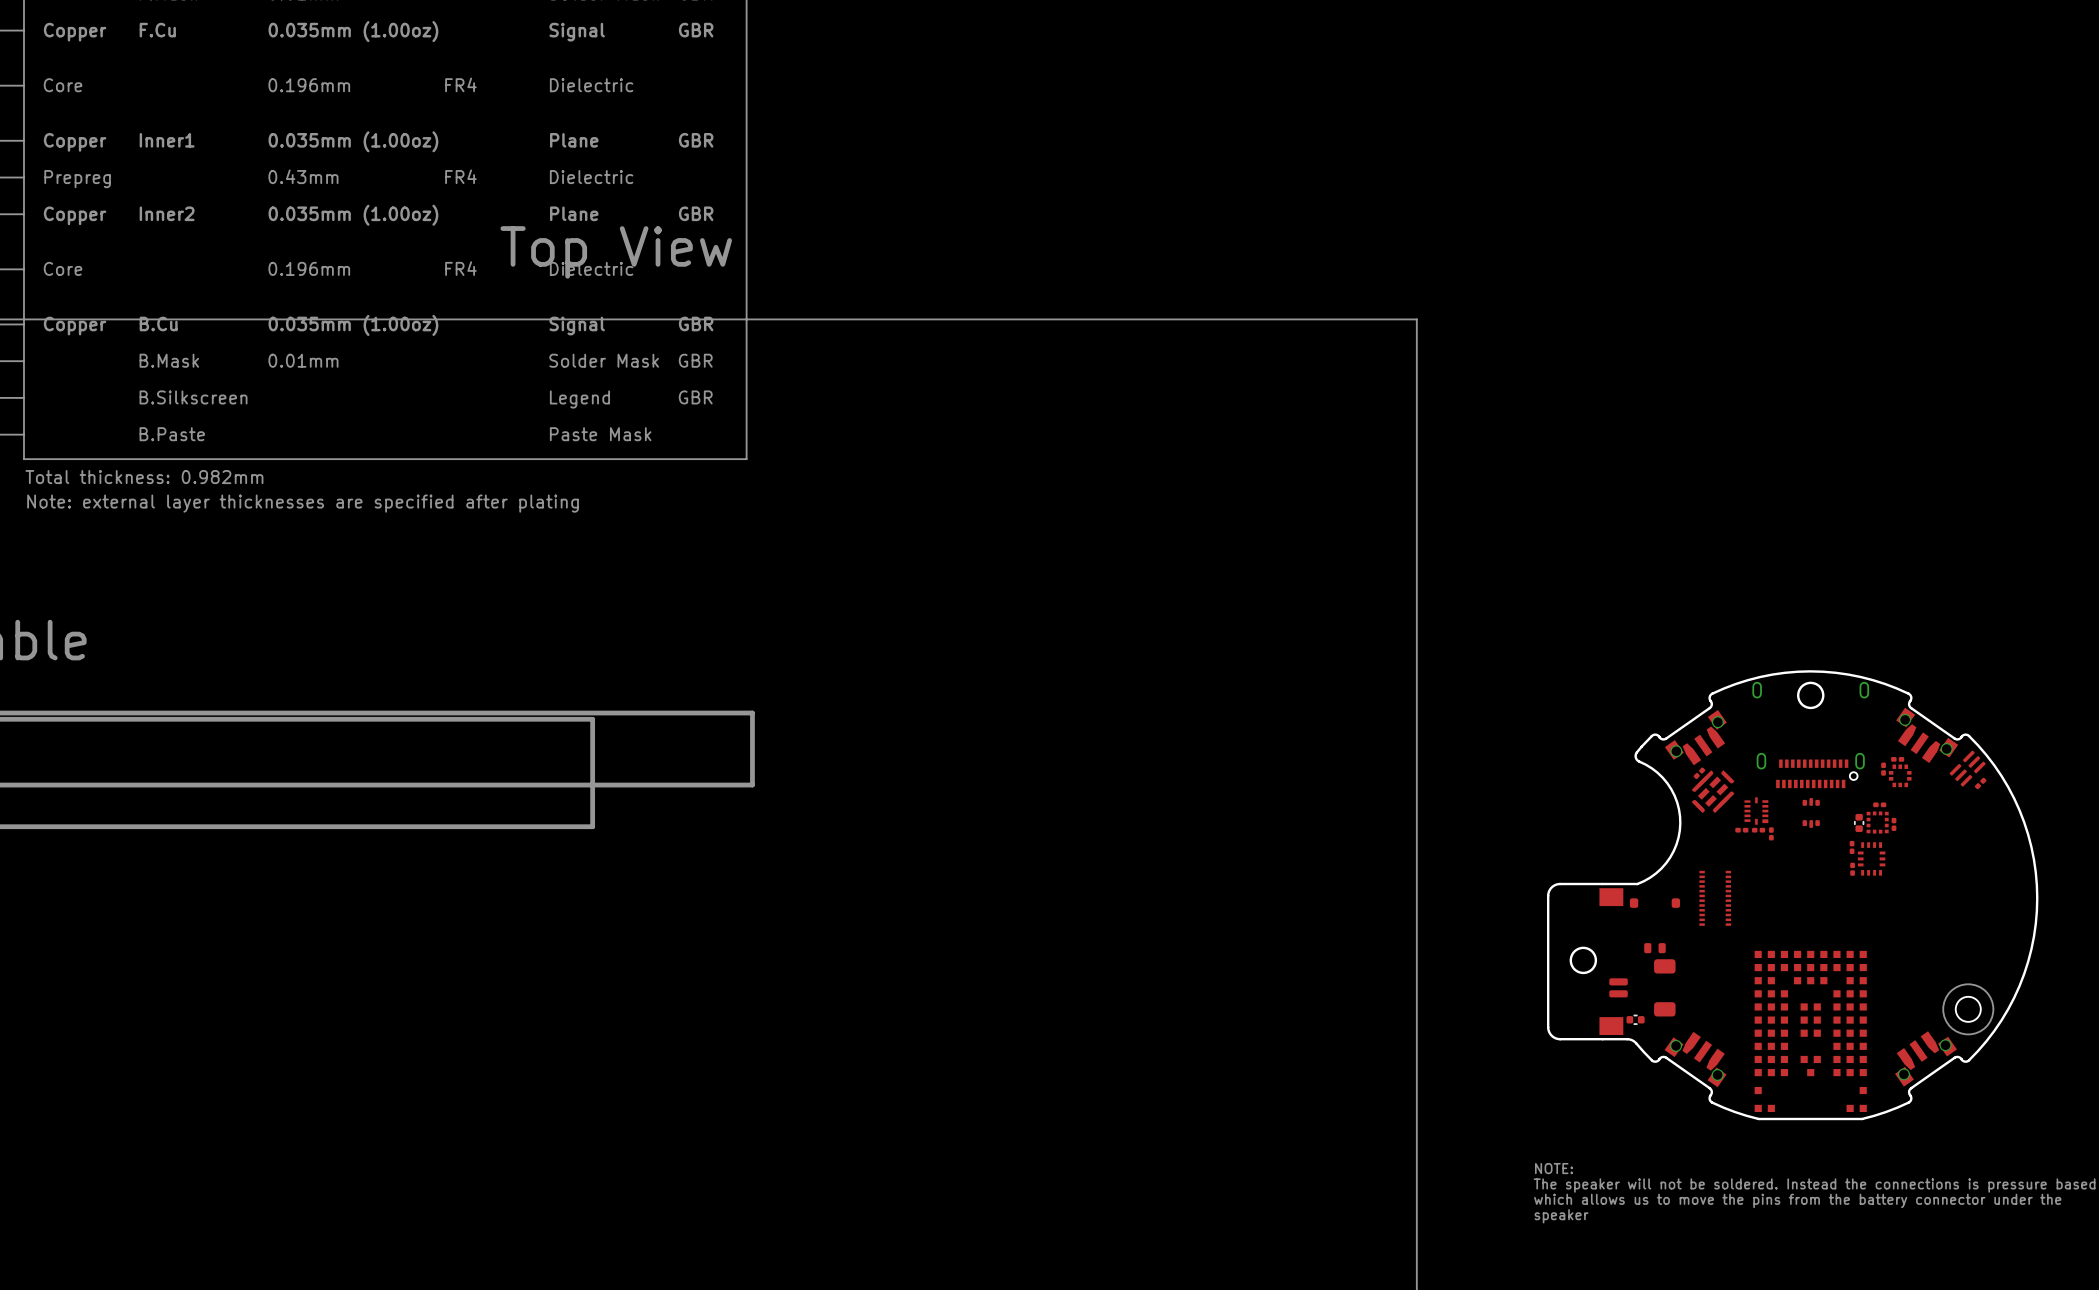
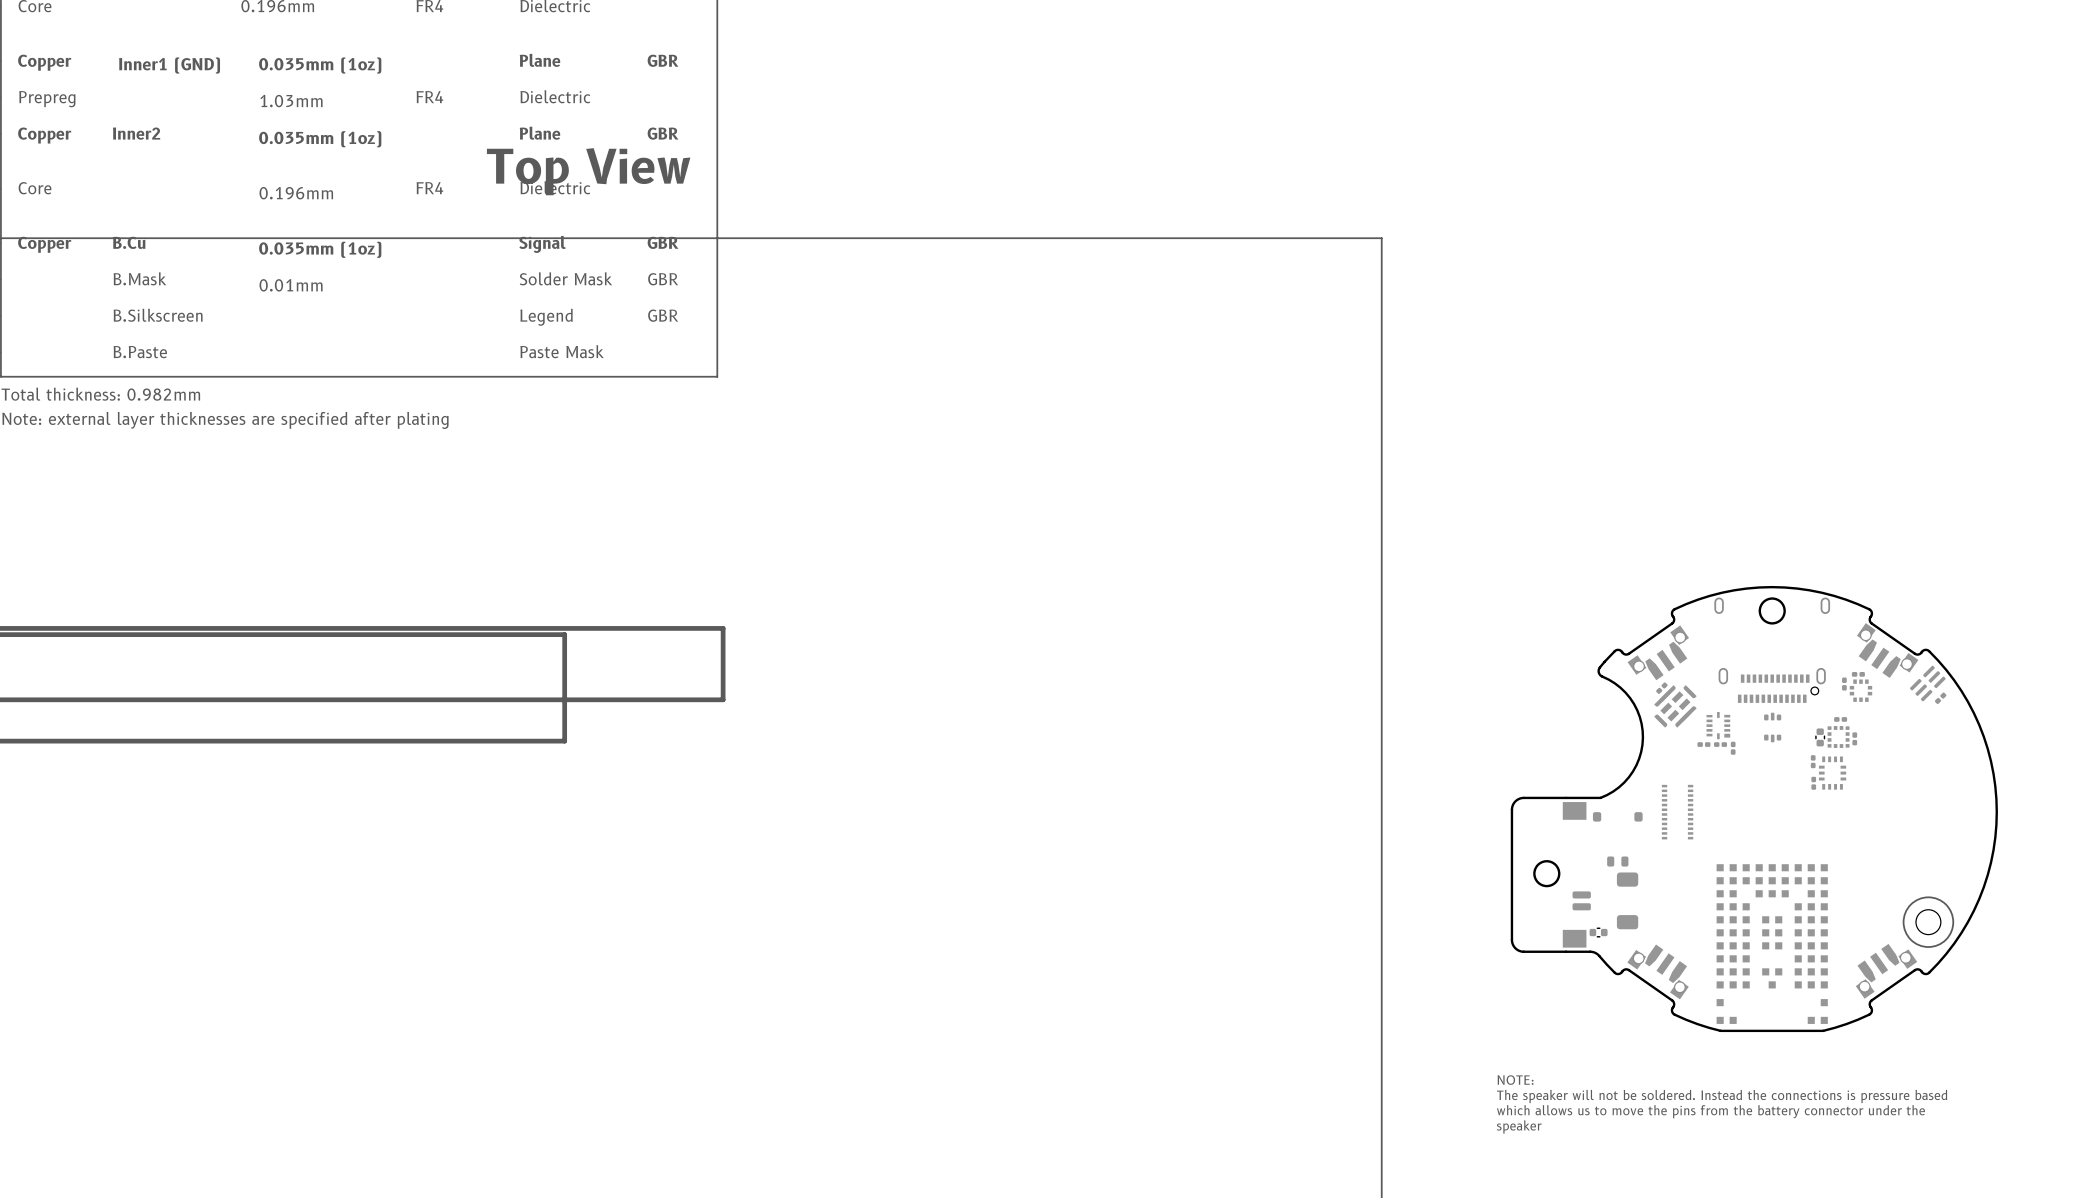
text: Inner1 (167, 140) -> Inner1 (GND) (169, 65)
text: 0.035mm (1.00oz) (353, 141) -> 0.035mm (1oz) (320, 65)
text: 0.43mm (303, 176) -> 1.03mm (291, 101)
text: 0.035mm (1.00oz) (353, 215) -> 0.035mm (1oz) (320, 139)
text position: 0.196mm (309, 268) -> 0.196mm (296, 193)
text: 0.035mm (1.00oz) (353, 325) -> 0.035mm (1oz) (320, 249)
text position: 0.01mm (303, 360) -> 0.01mm (291, 285)

